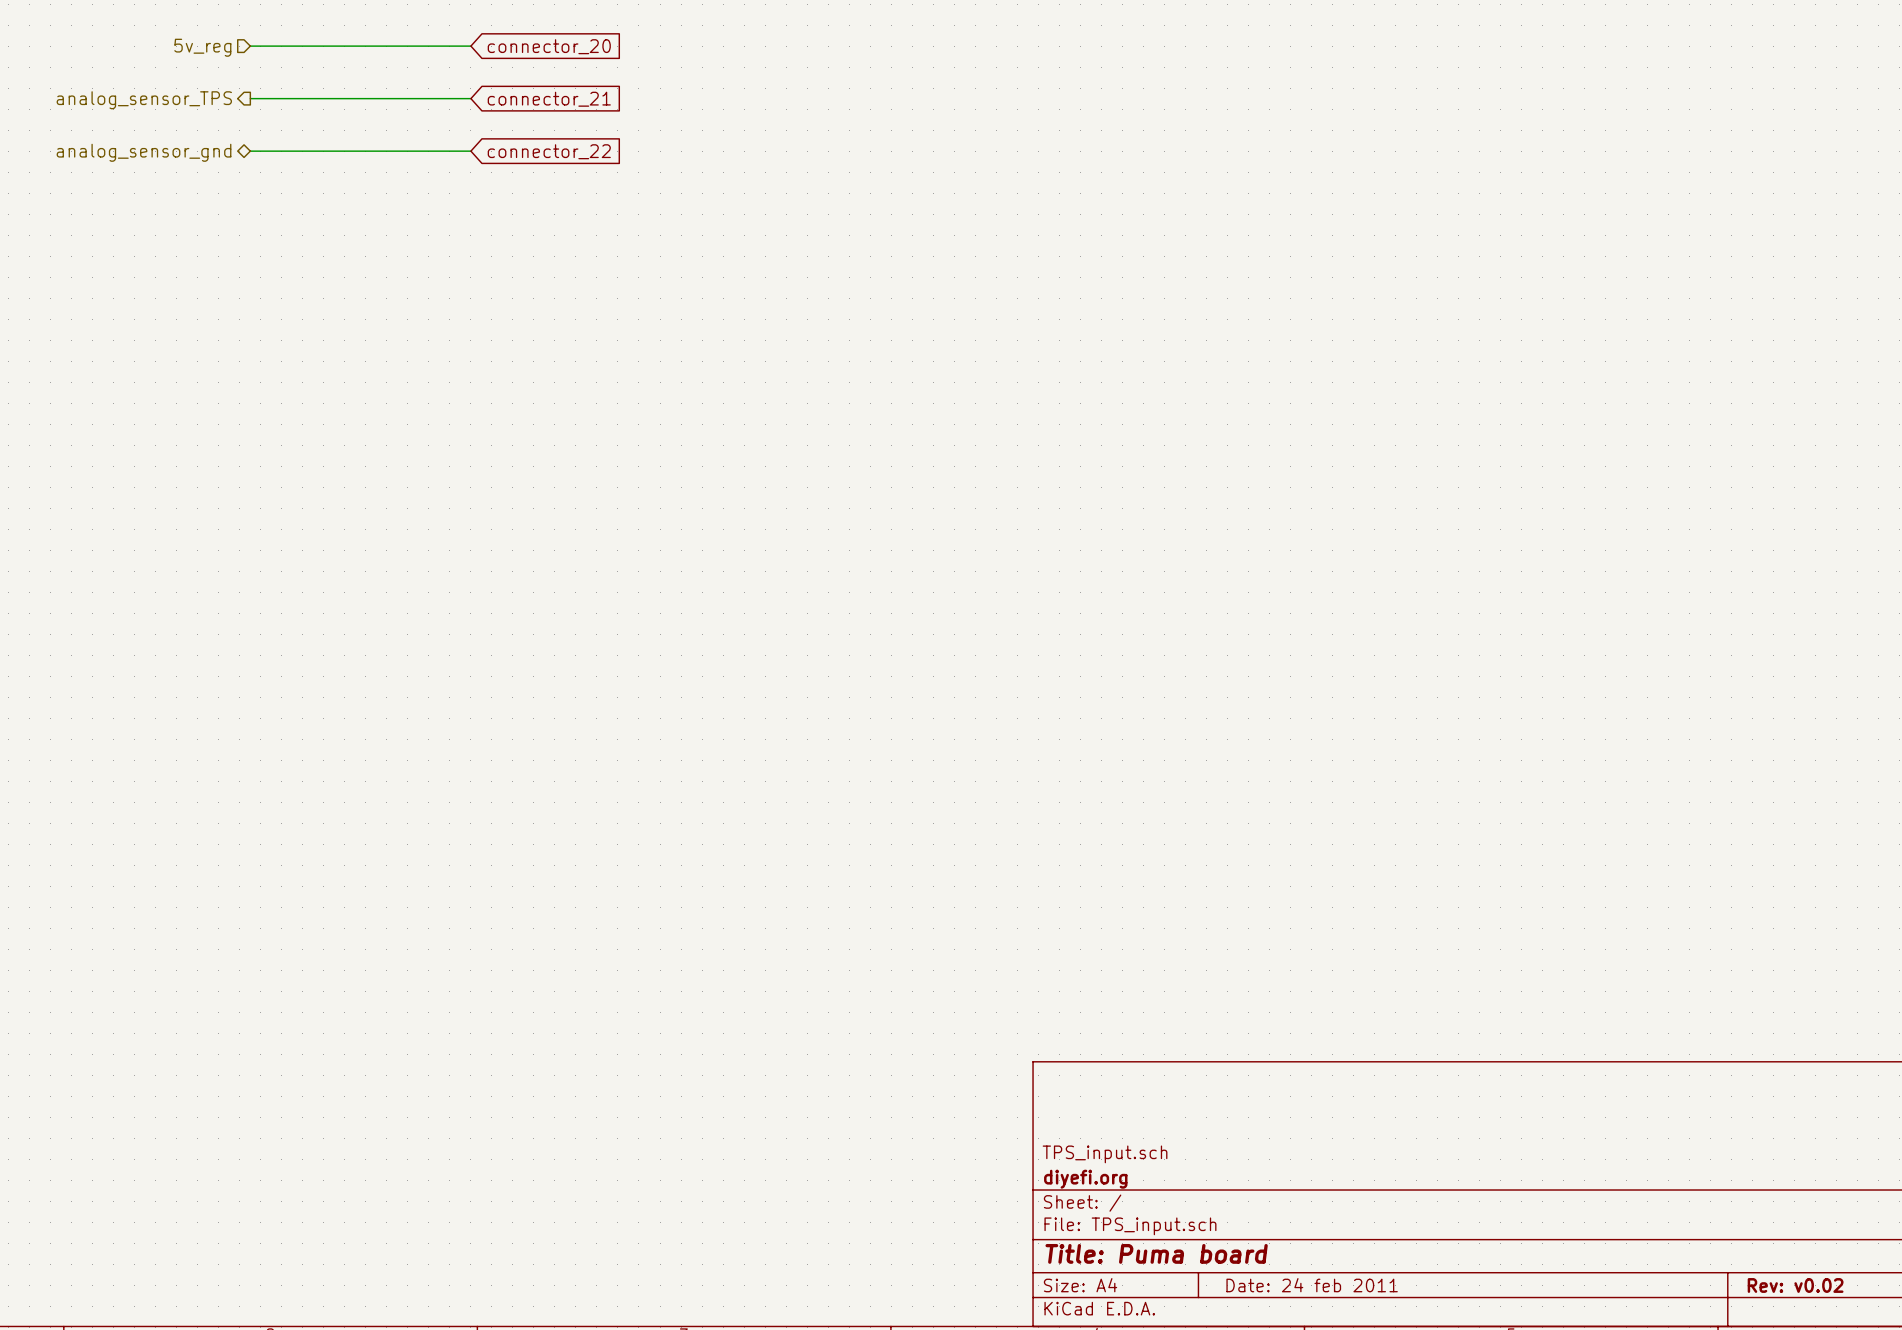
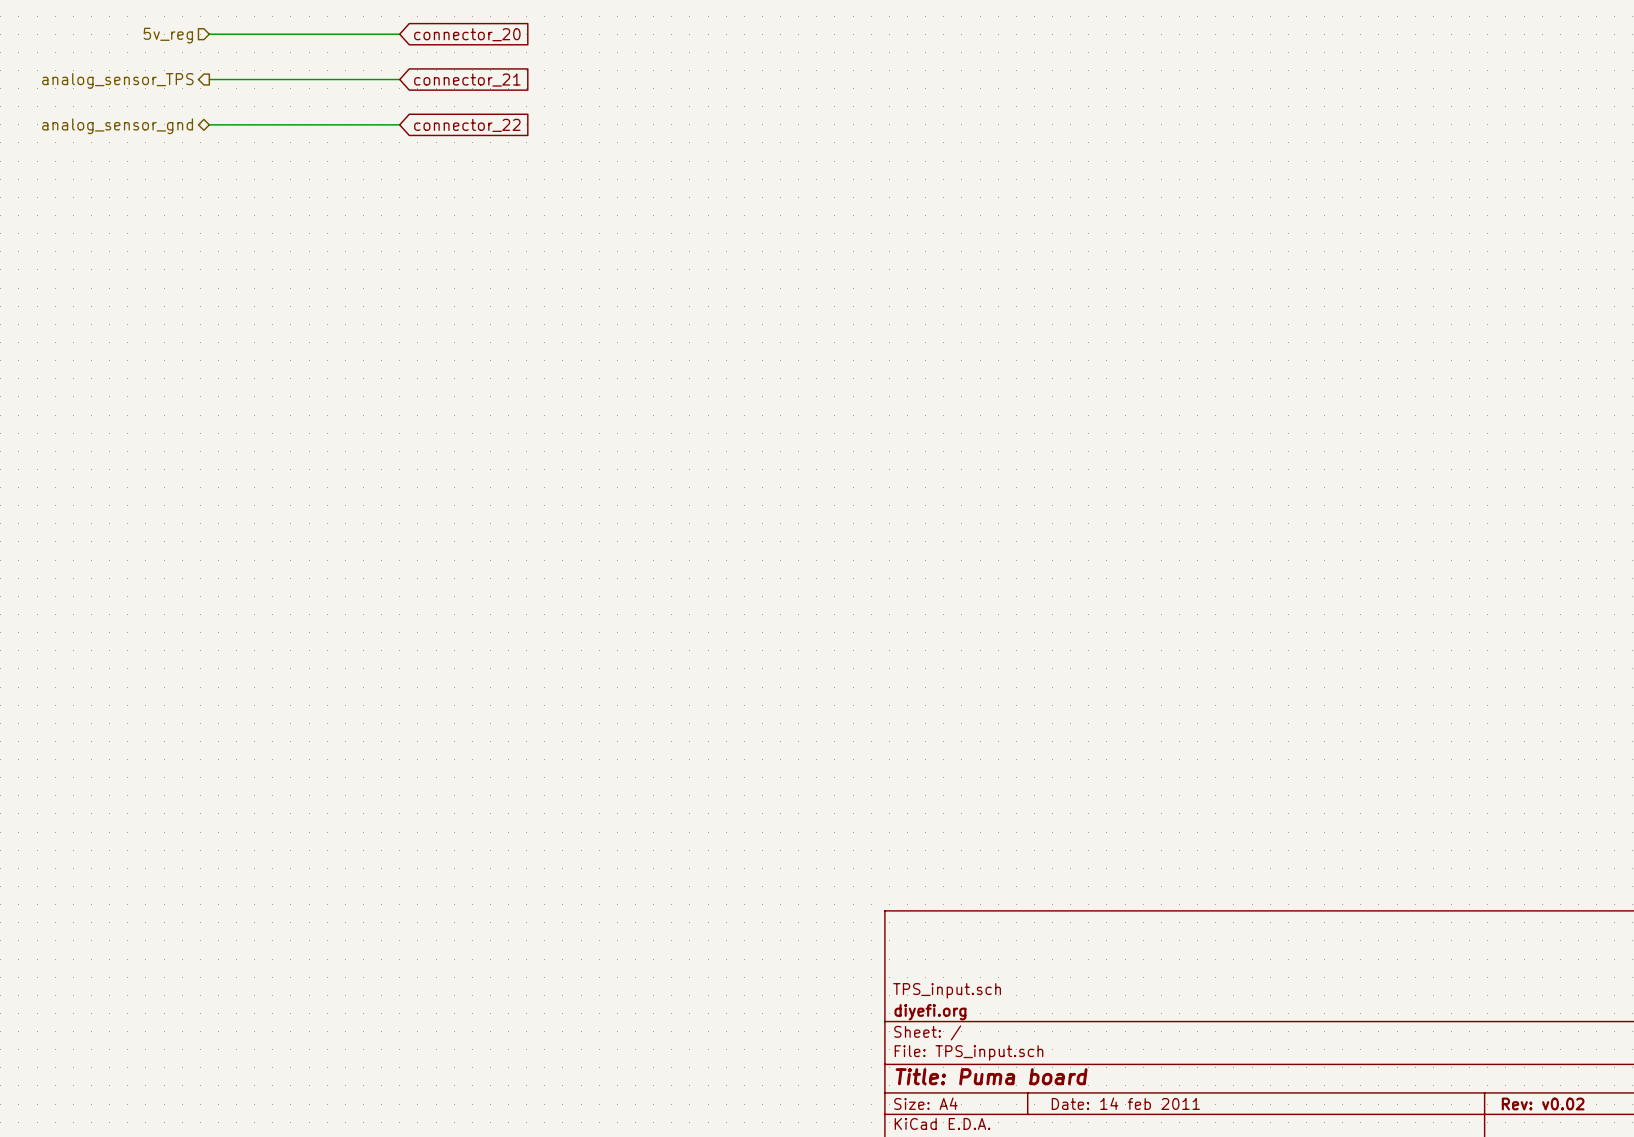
title block: Date: 24 feb 2011 (1312, 1285) -> Date: 14 feb 2011 (1125, 1103)

